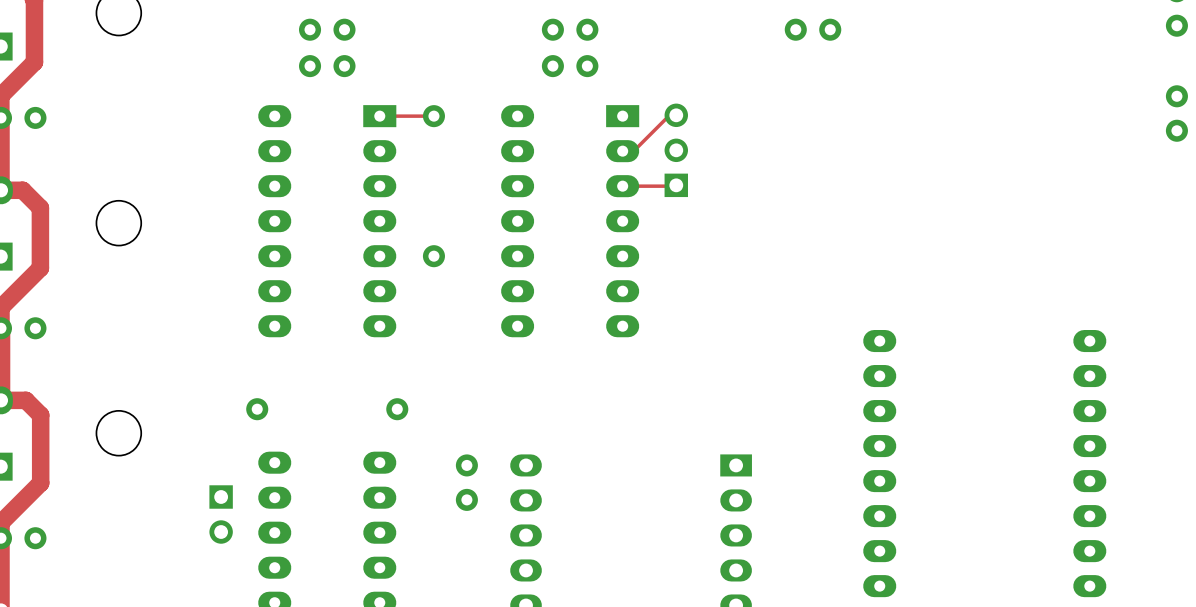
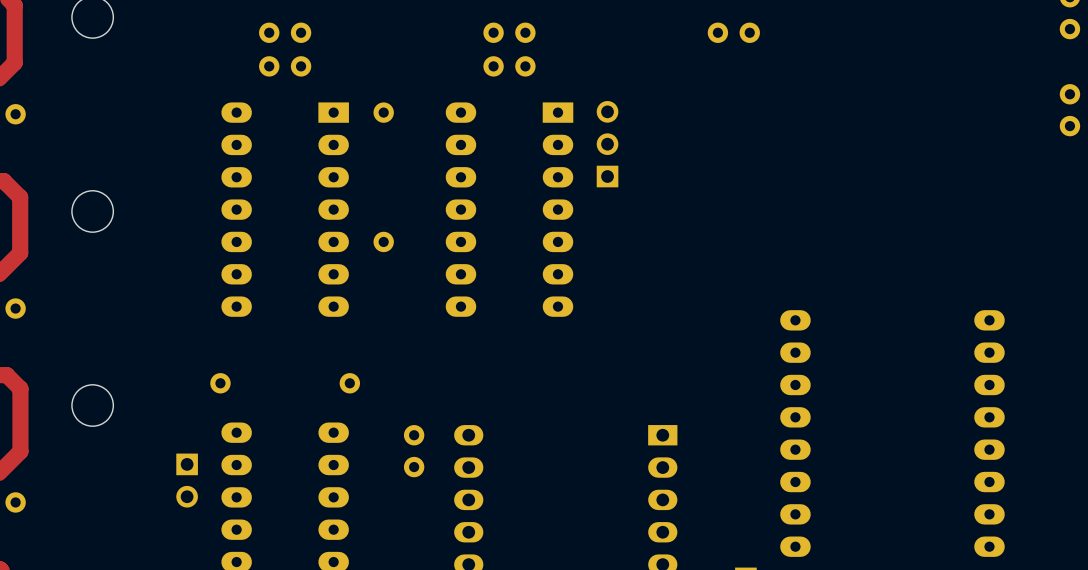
top track: (379, 116) (434, 116) -> none
top track: (675, 116) (668, 116) (633, 151) (622, 151) -> none
top track: (676, 184) (622, 186) -> none

